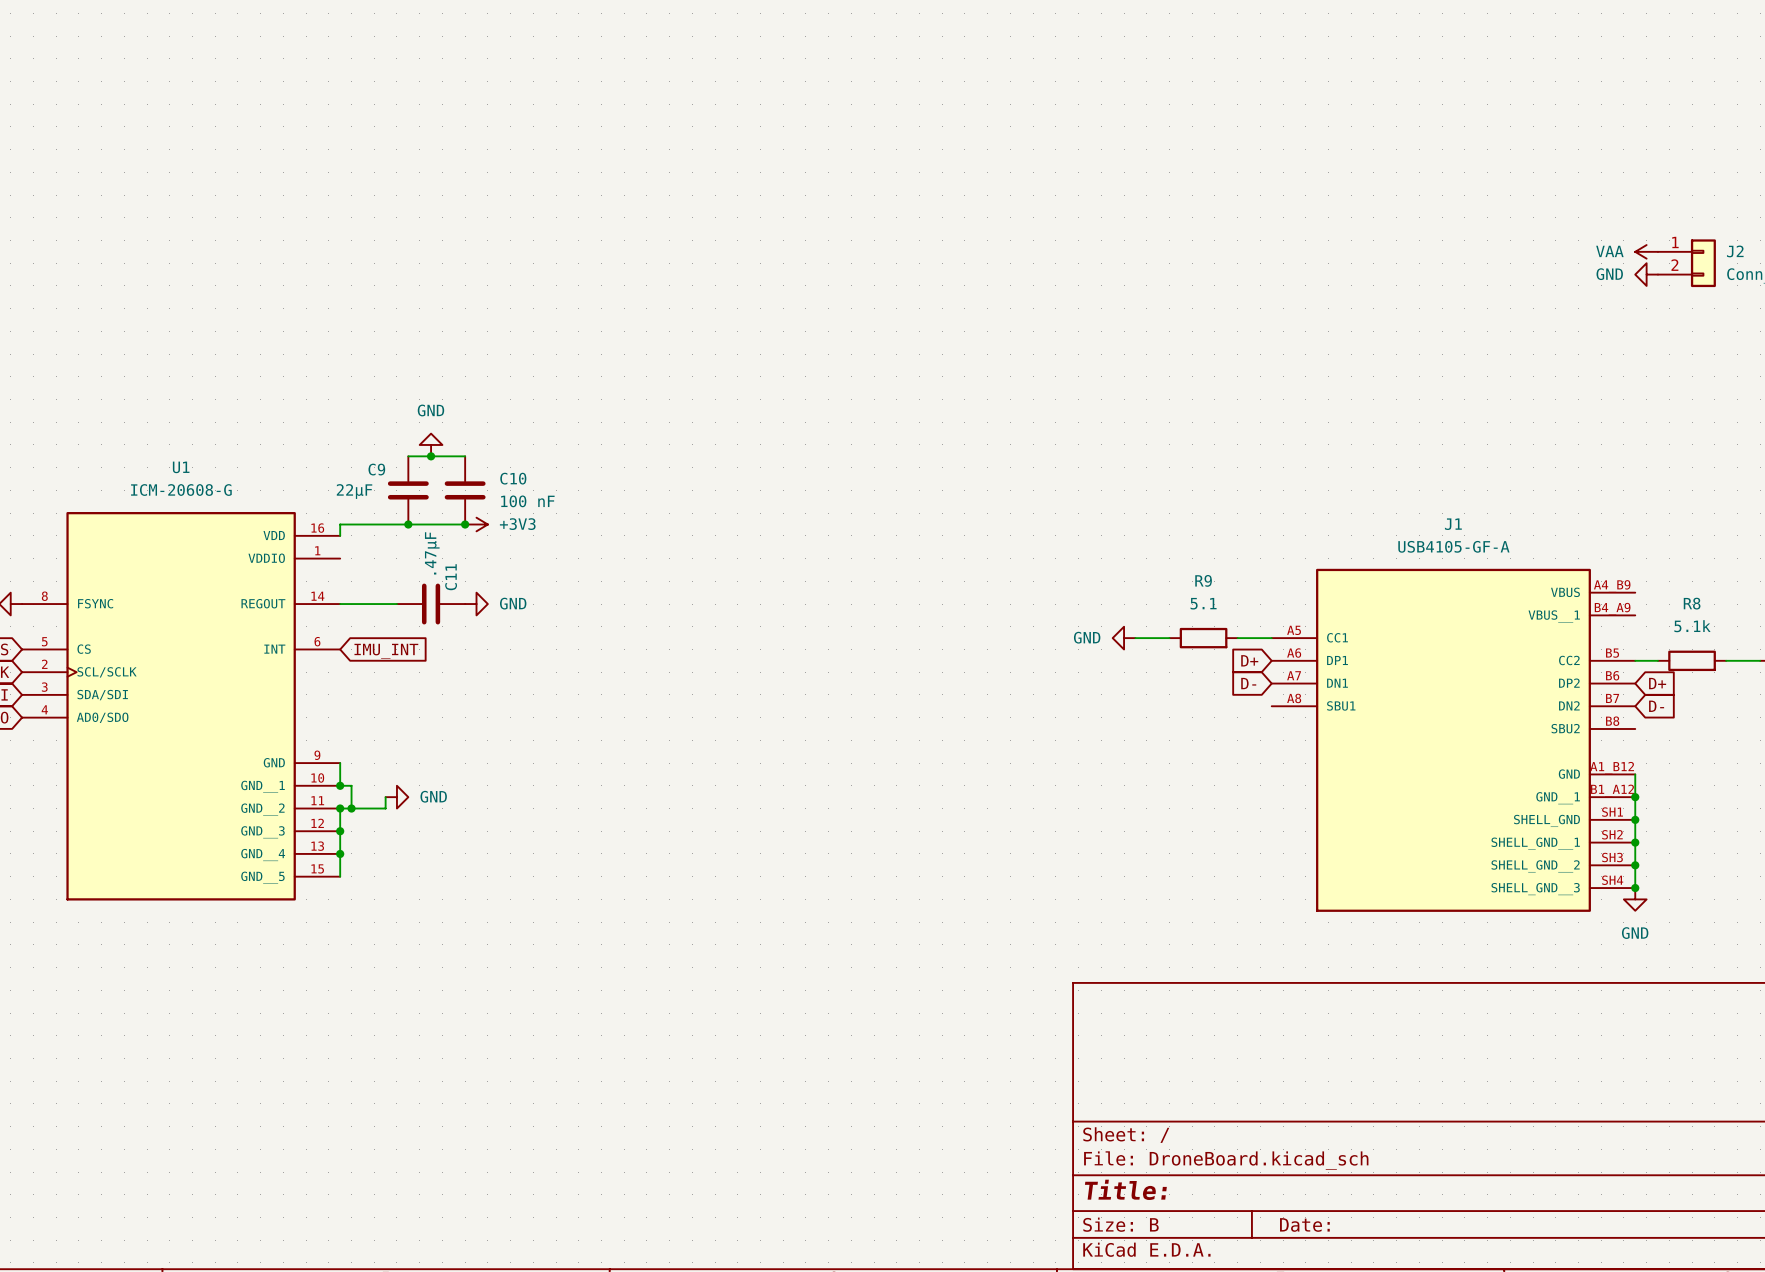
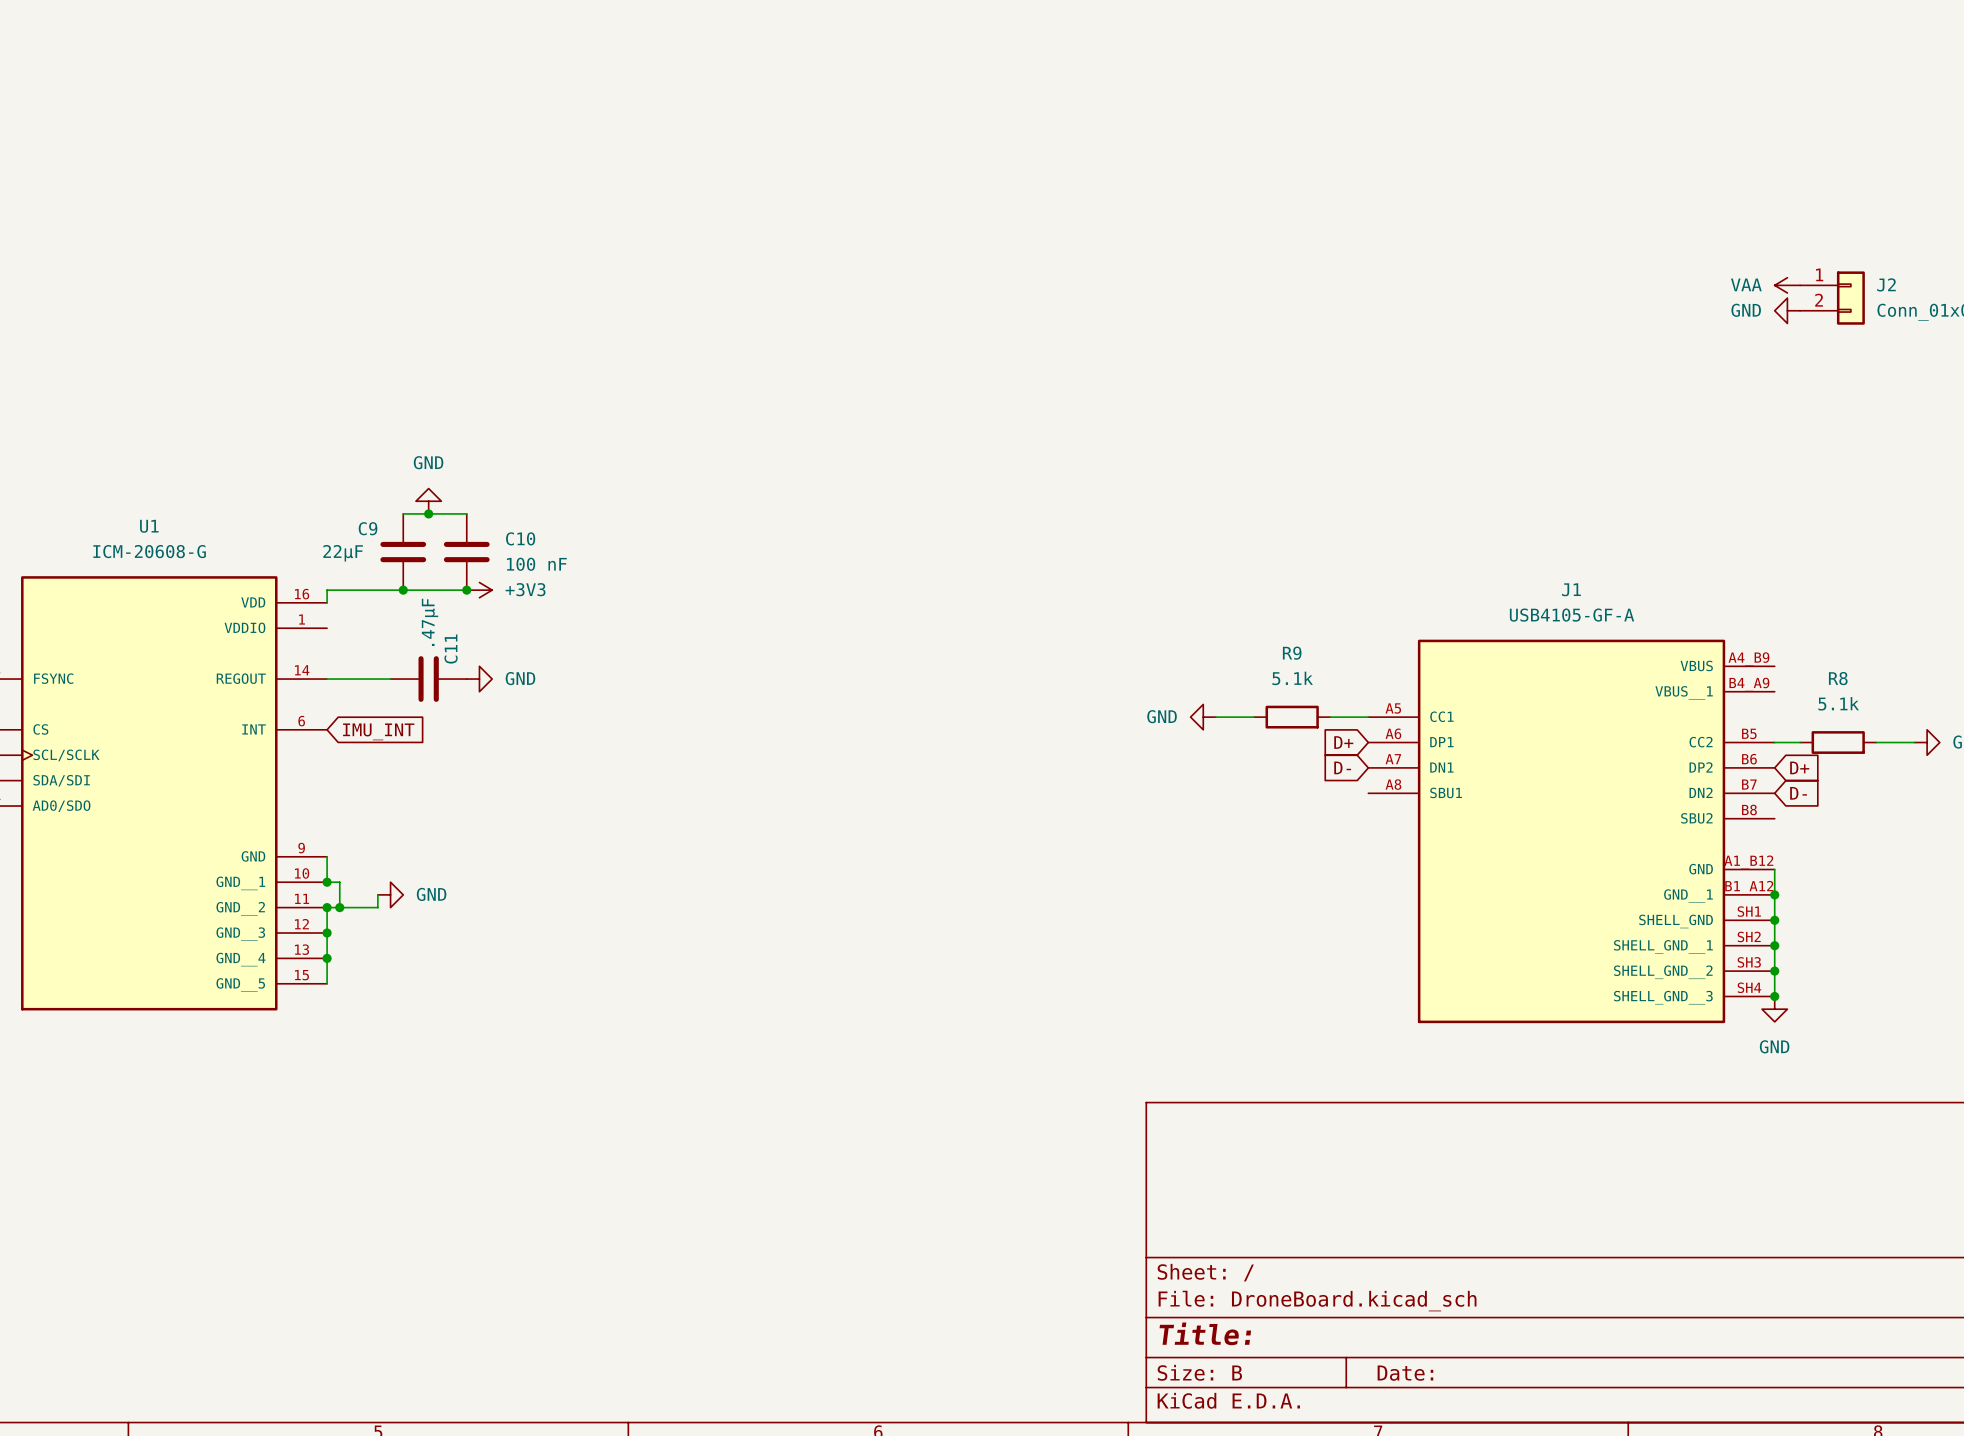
R9 value: 5.1 (1203, 603) -> 5.1k (1292, 678)

